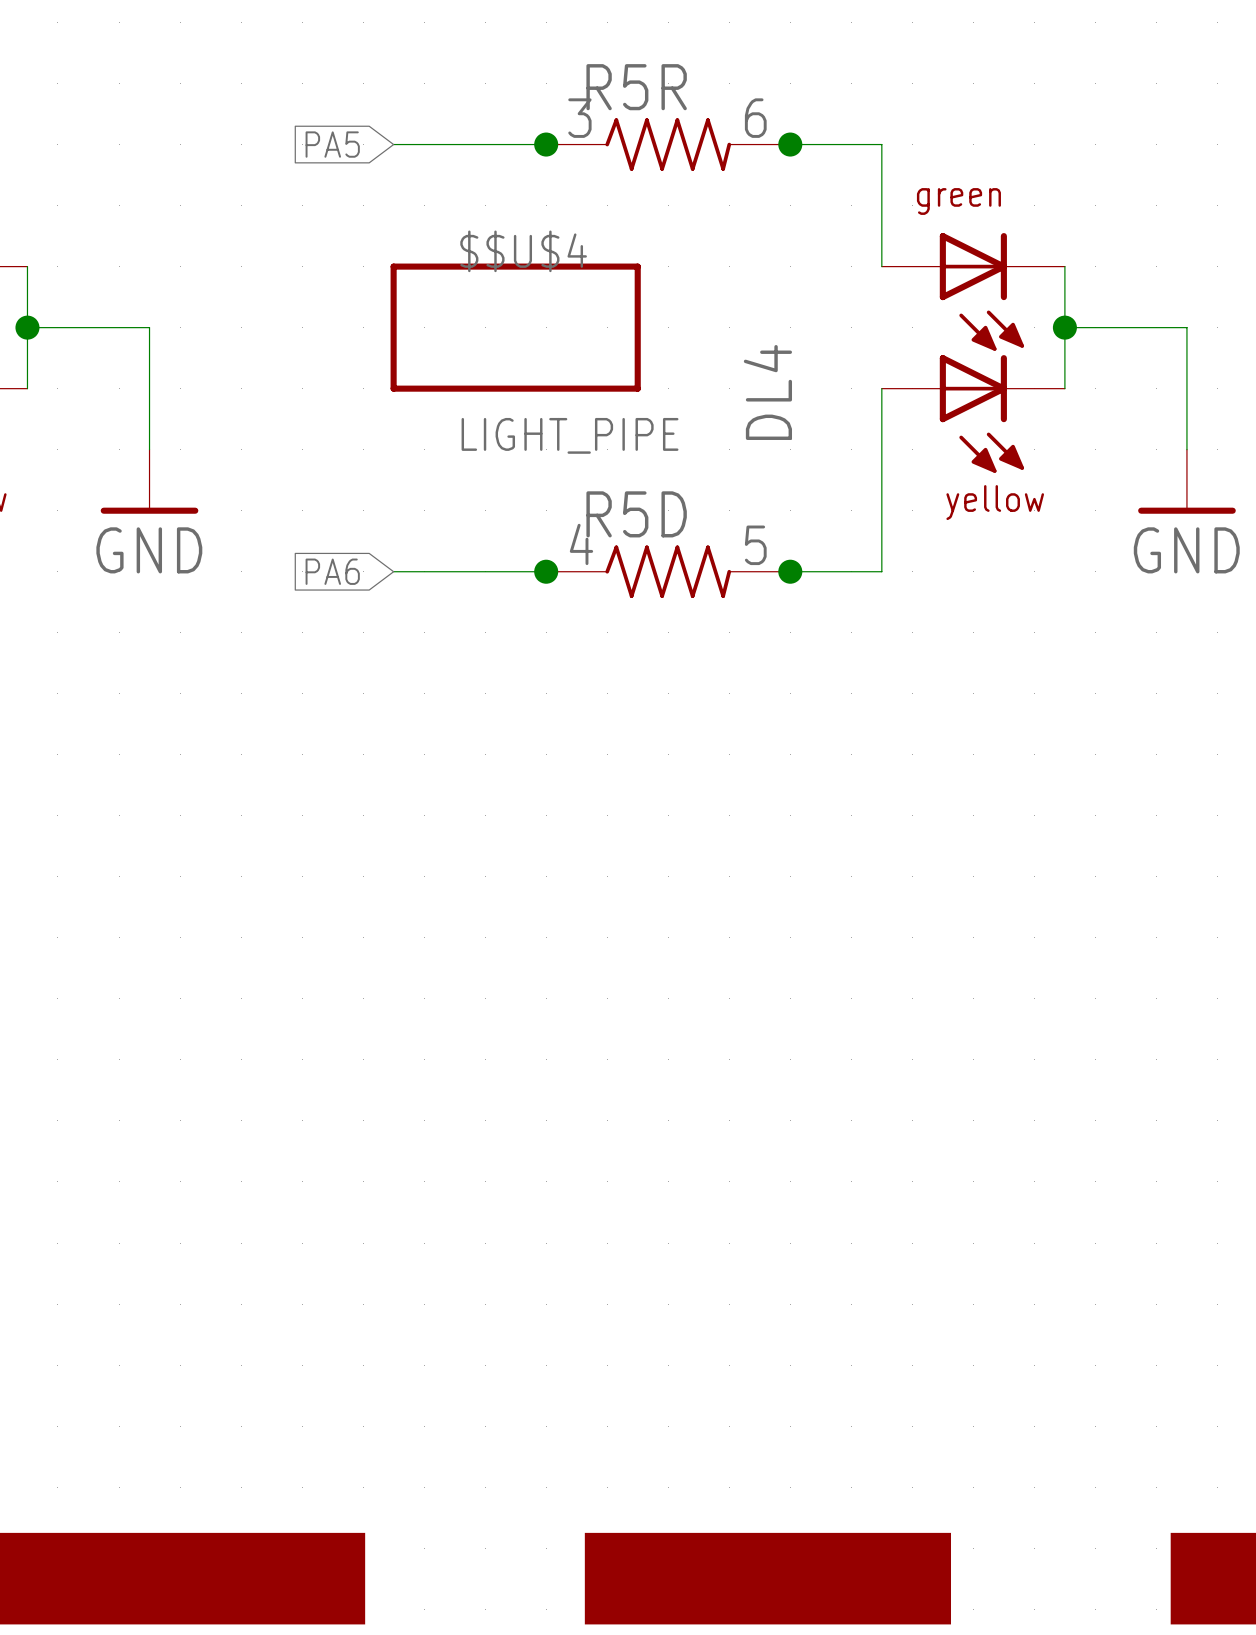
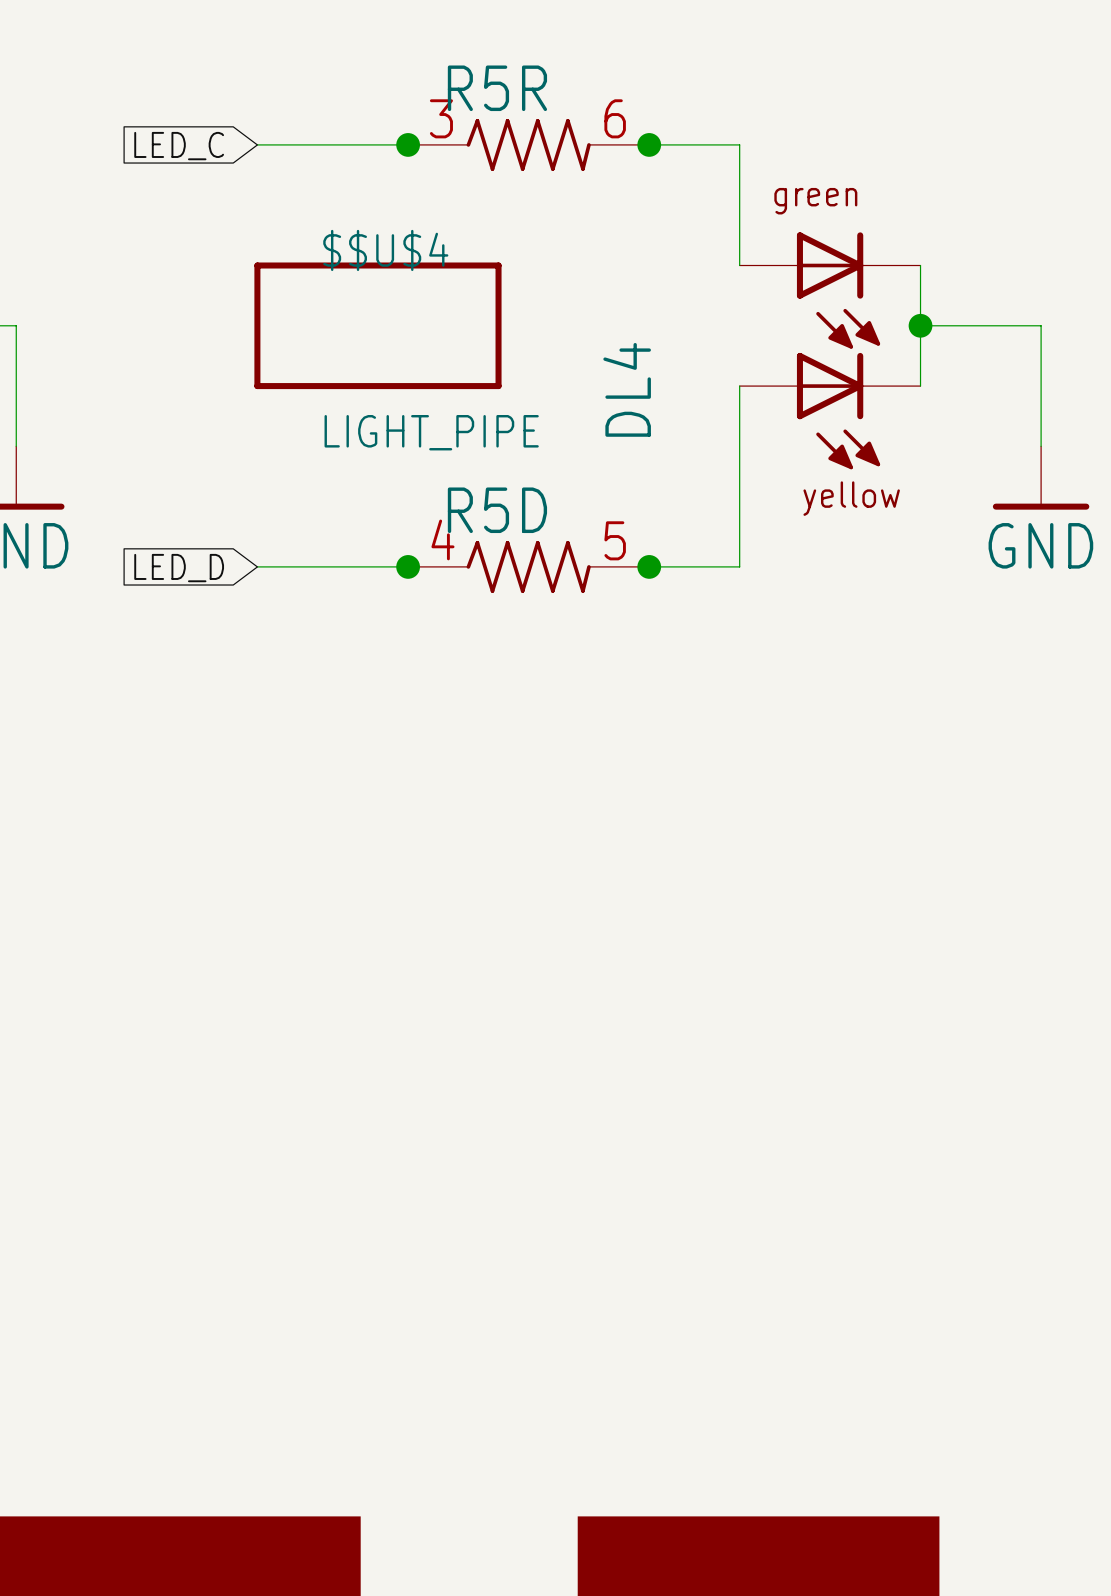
global label: PA5 (332, 144) -> LED_C (179, 146)
global label: PA6 (332, 571) -> LED_D (179, 568)

